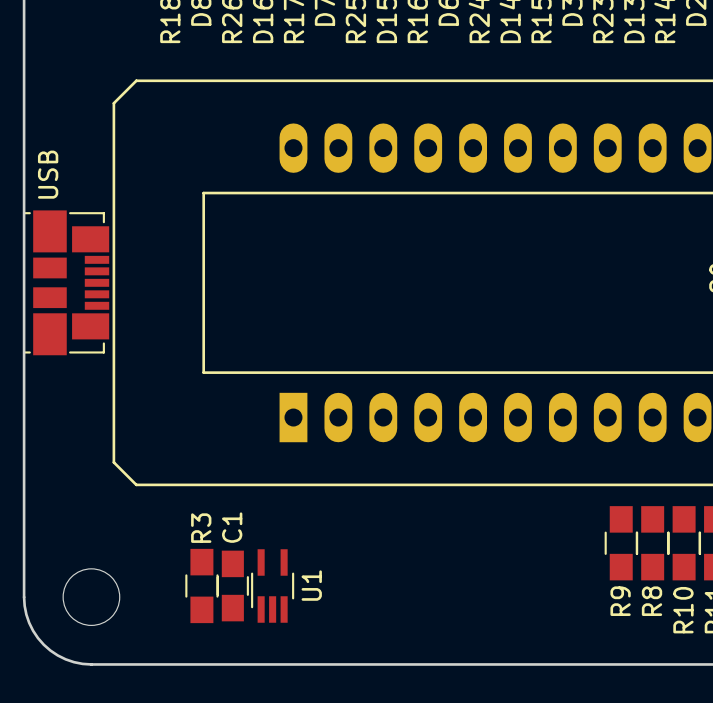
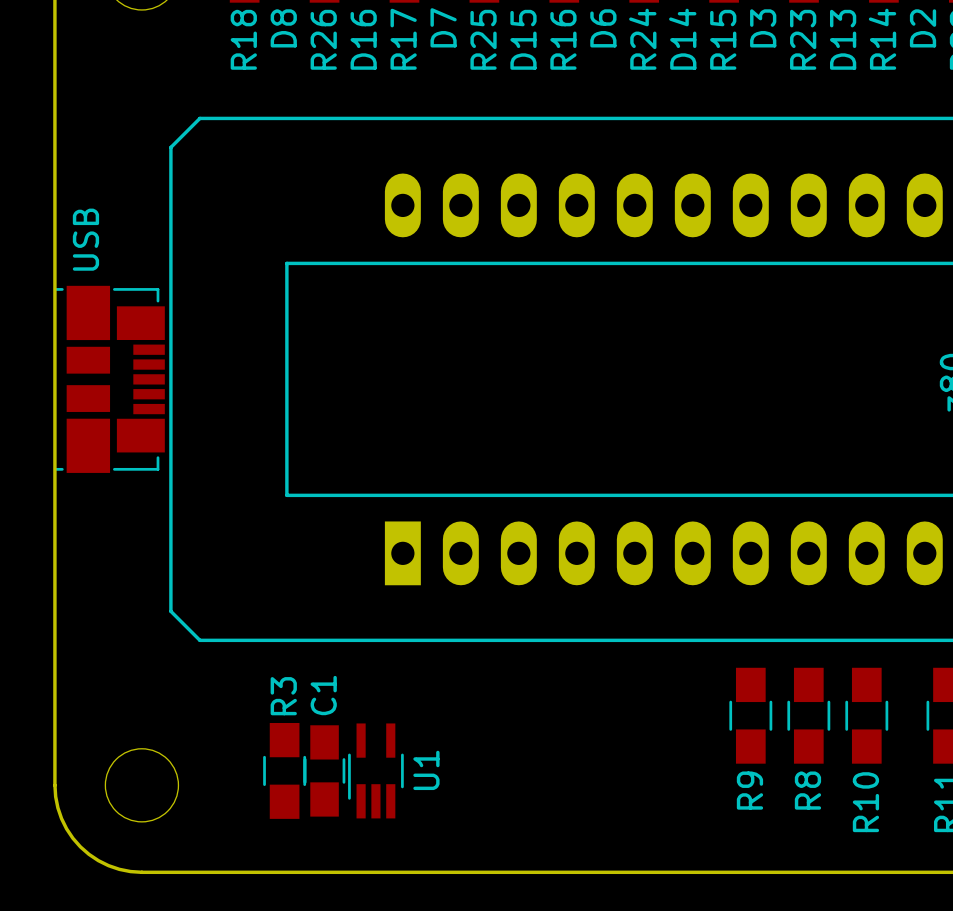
R8: none -> (808, 715)
R9 position: (621, 543) -> (750, 715)
R10: (684, 543) -> none
R8 name: R8 (652, 601) -> R10 (865, 802)

